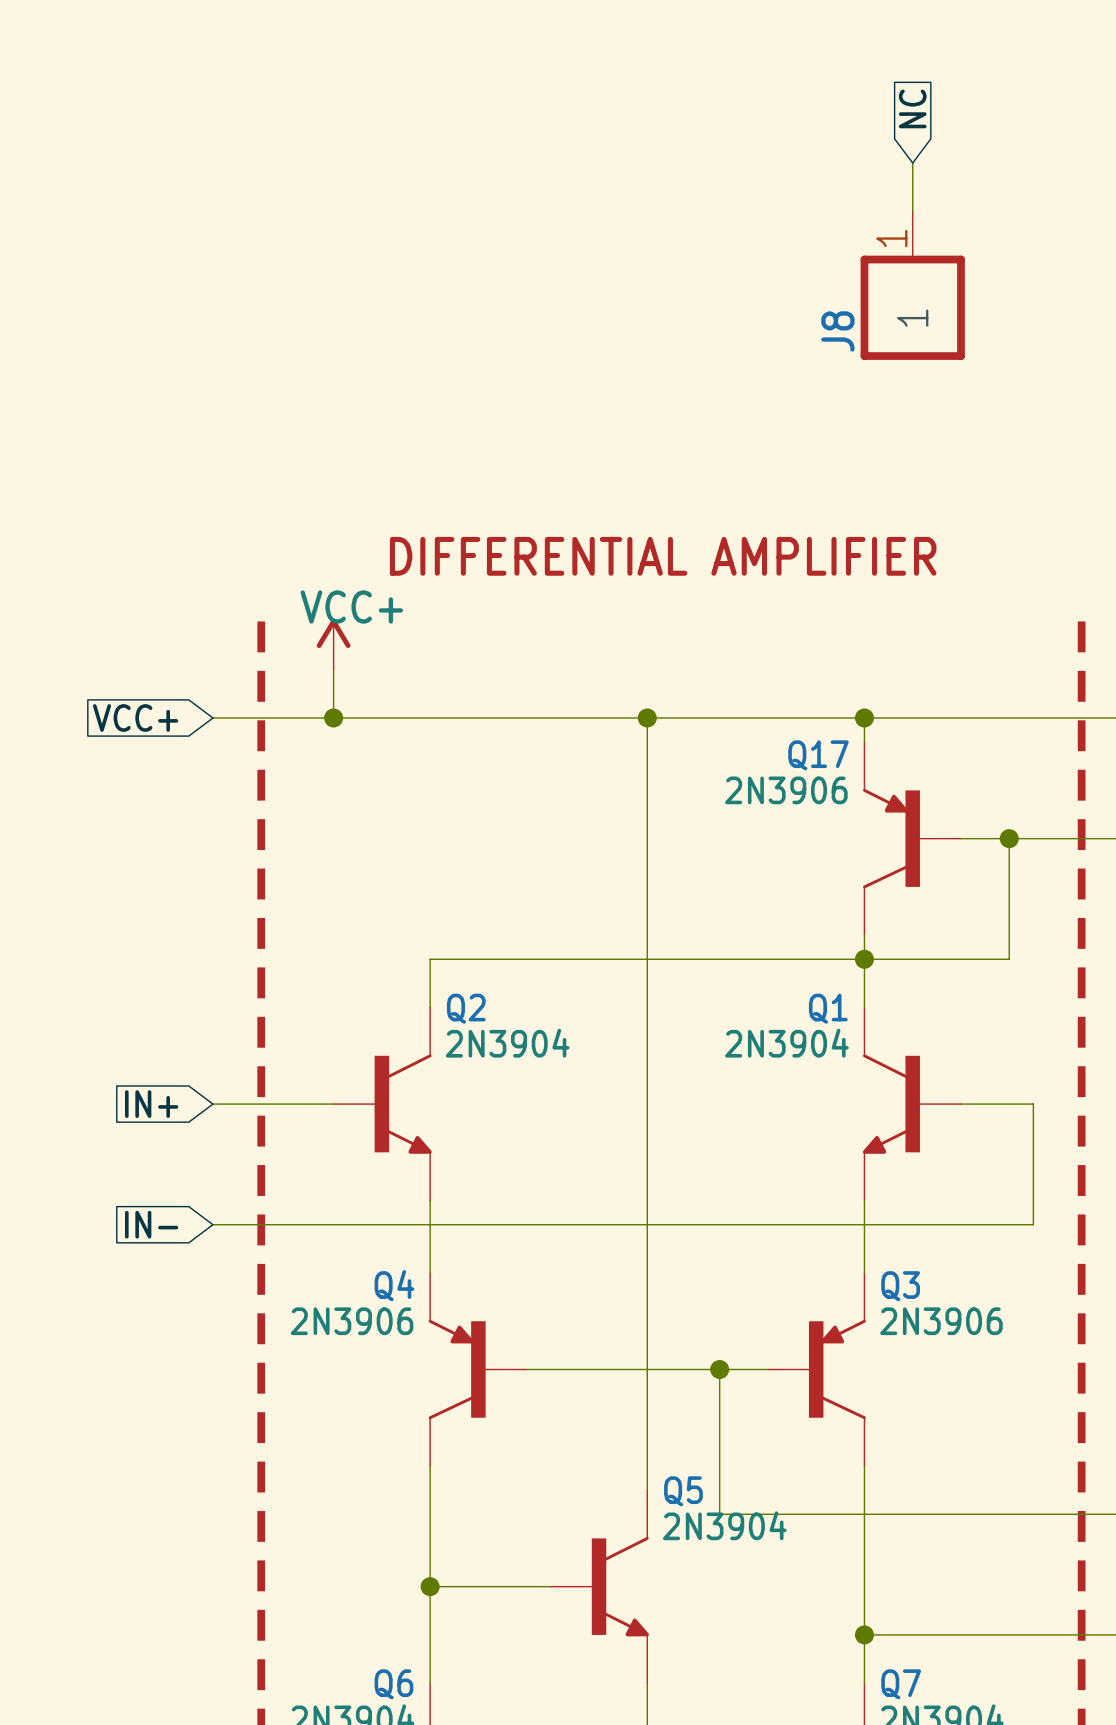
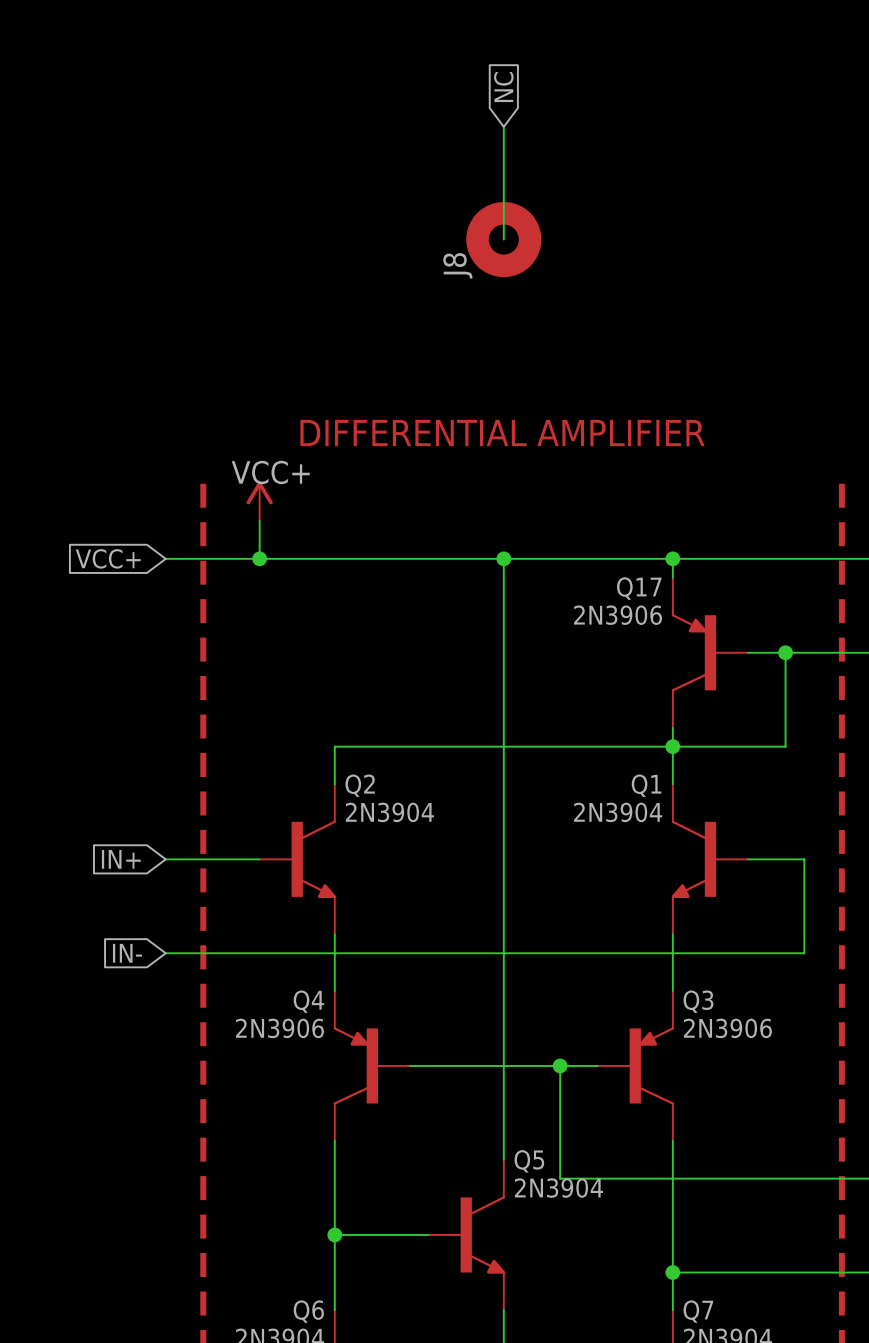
global label position: NC (912, 108) -> NC (503, 87)
wire: none -> (503, 126) (503, 239)
wire: (912, 163) (912, 211) -> none
J8 symbol: [860, 211, 965, 360] -> [466, 202, 542, 278]

